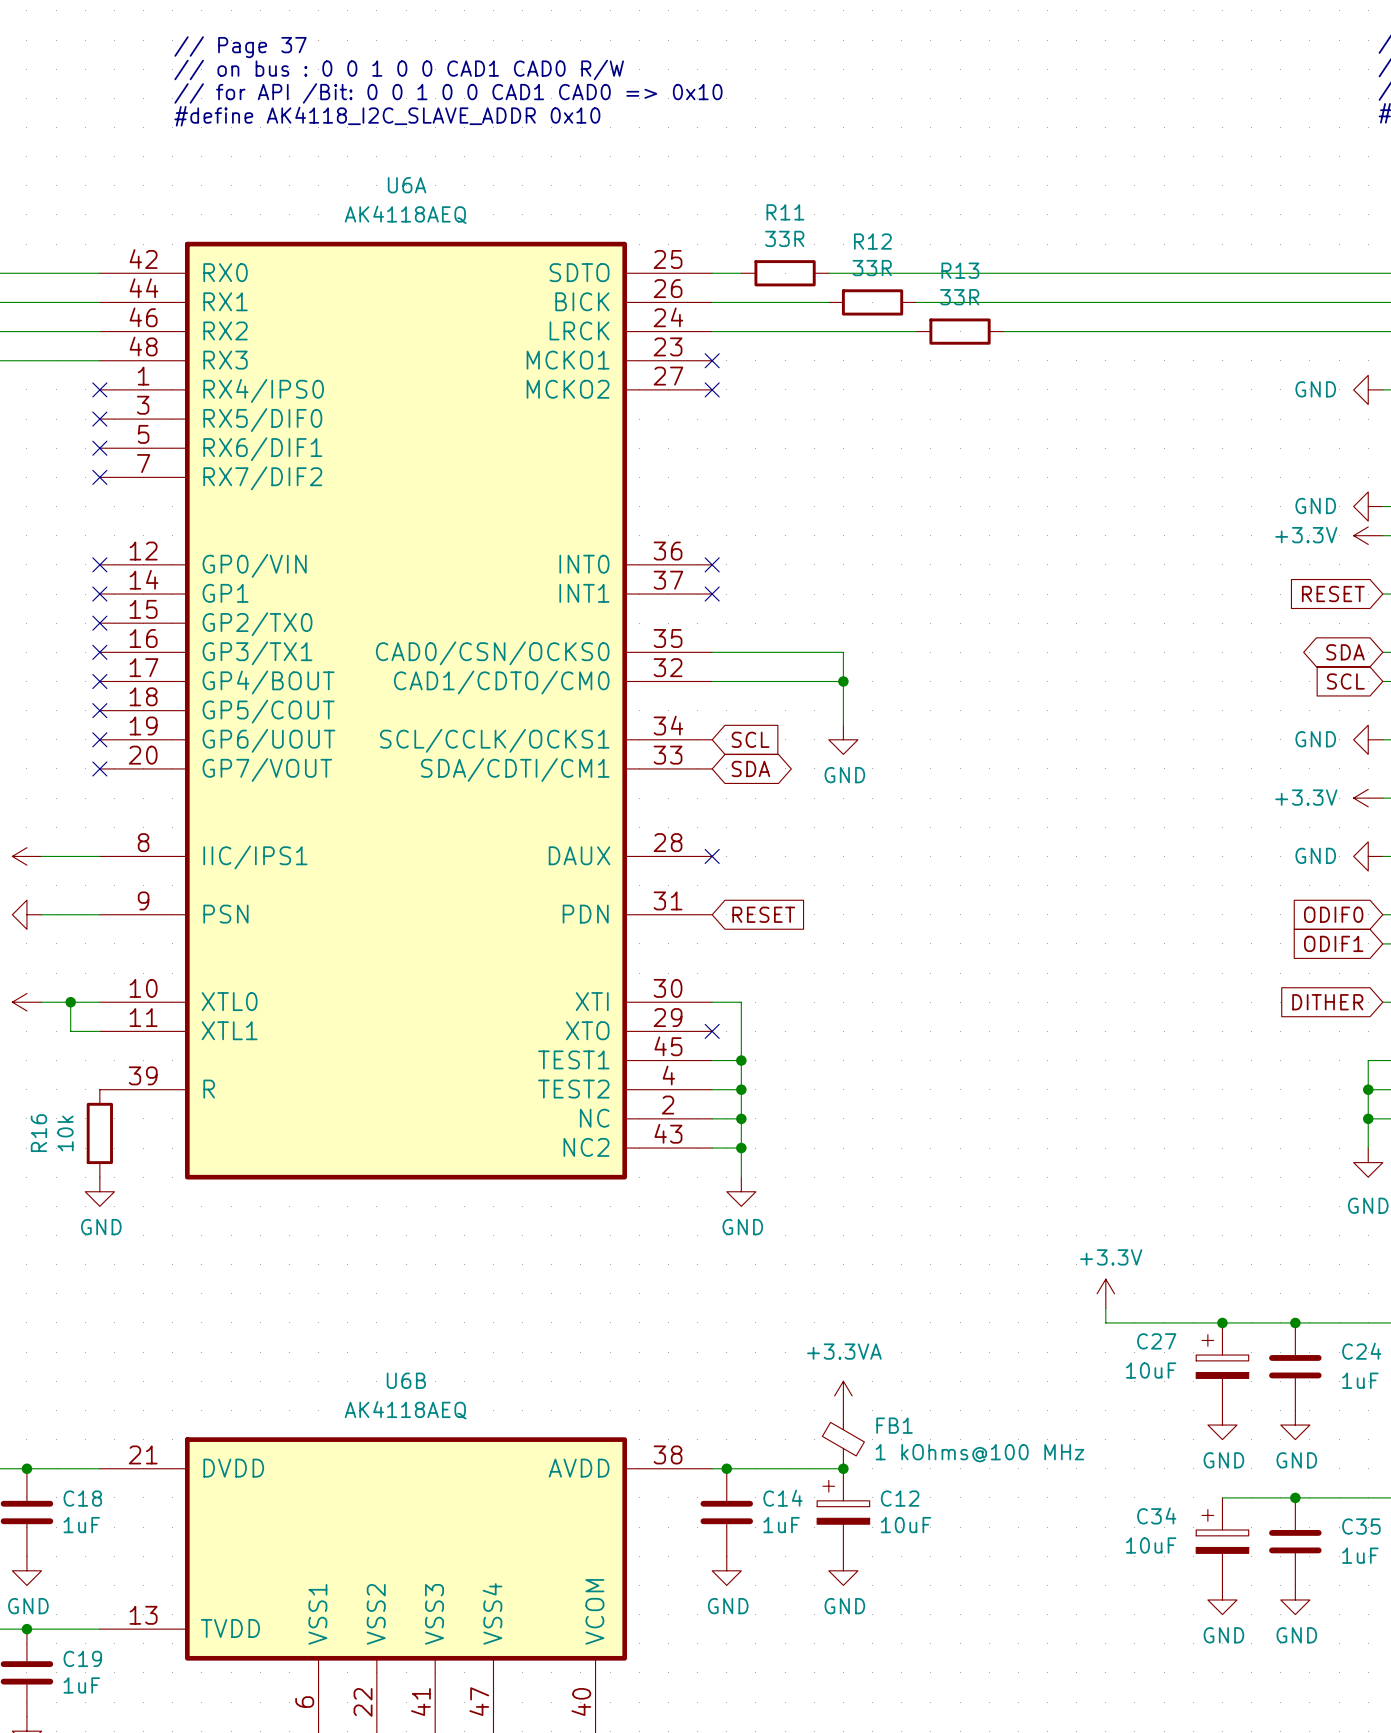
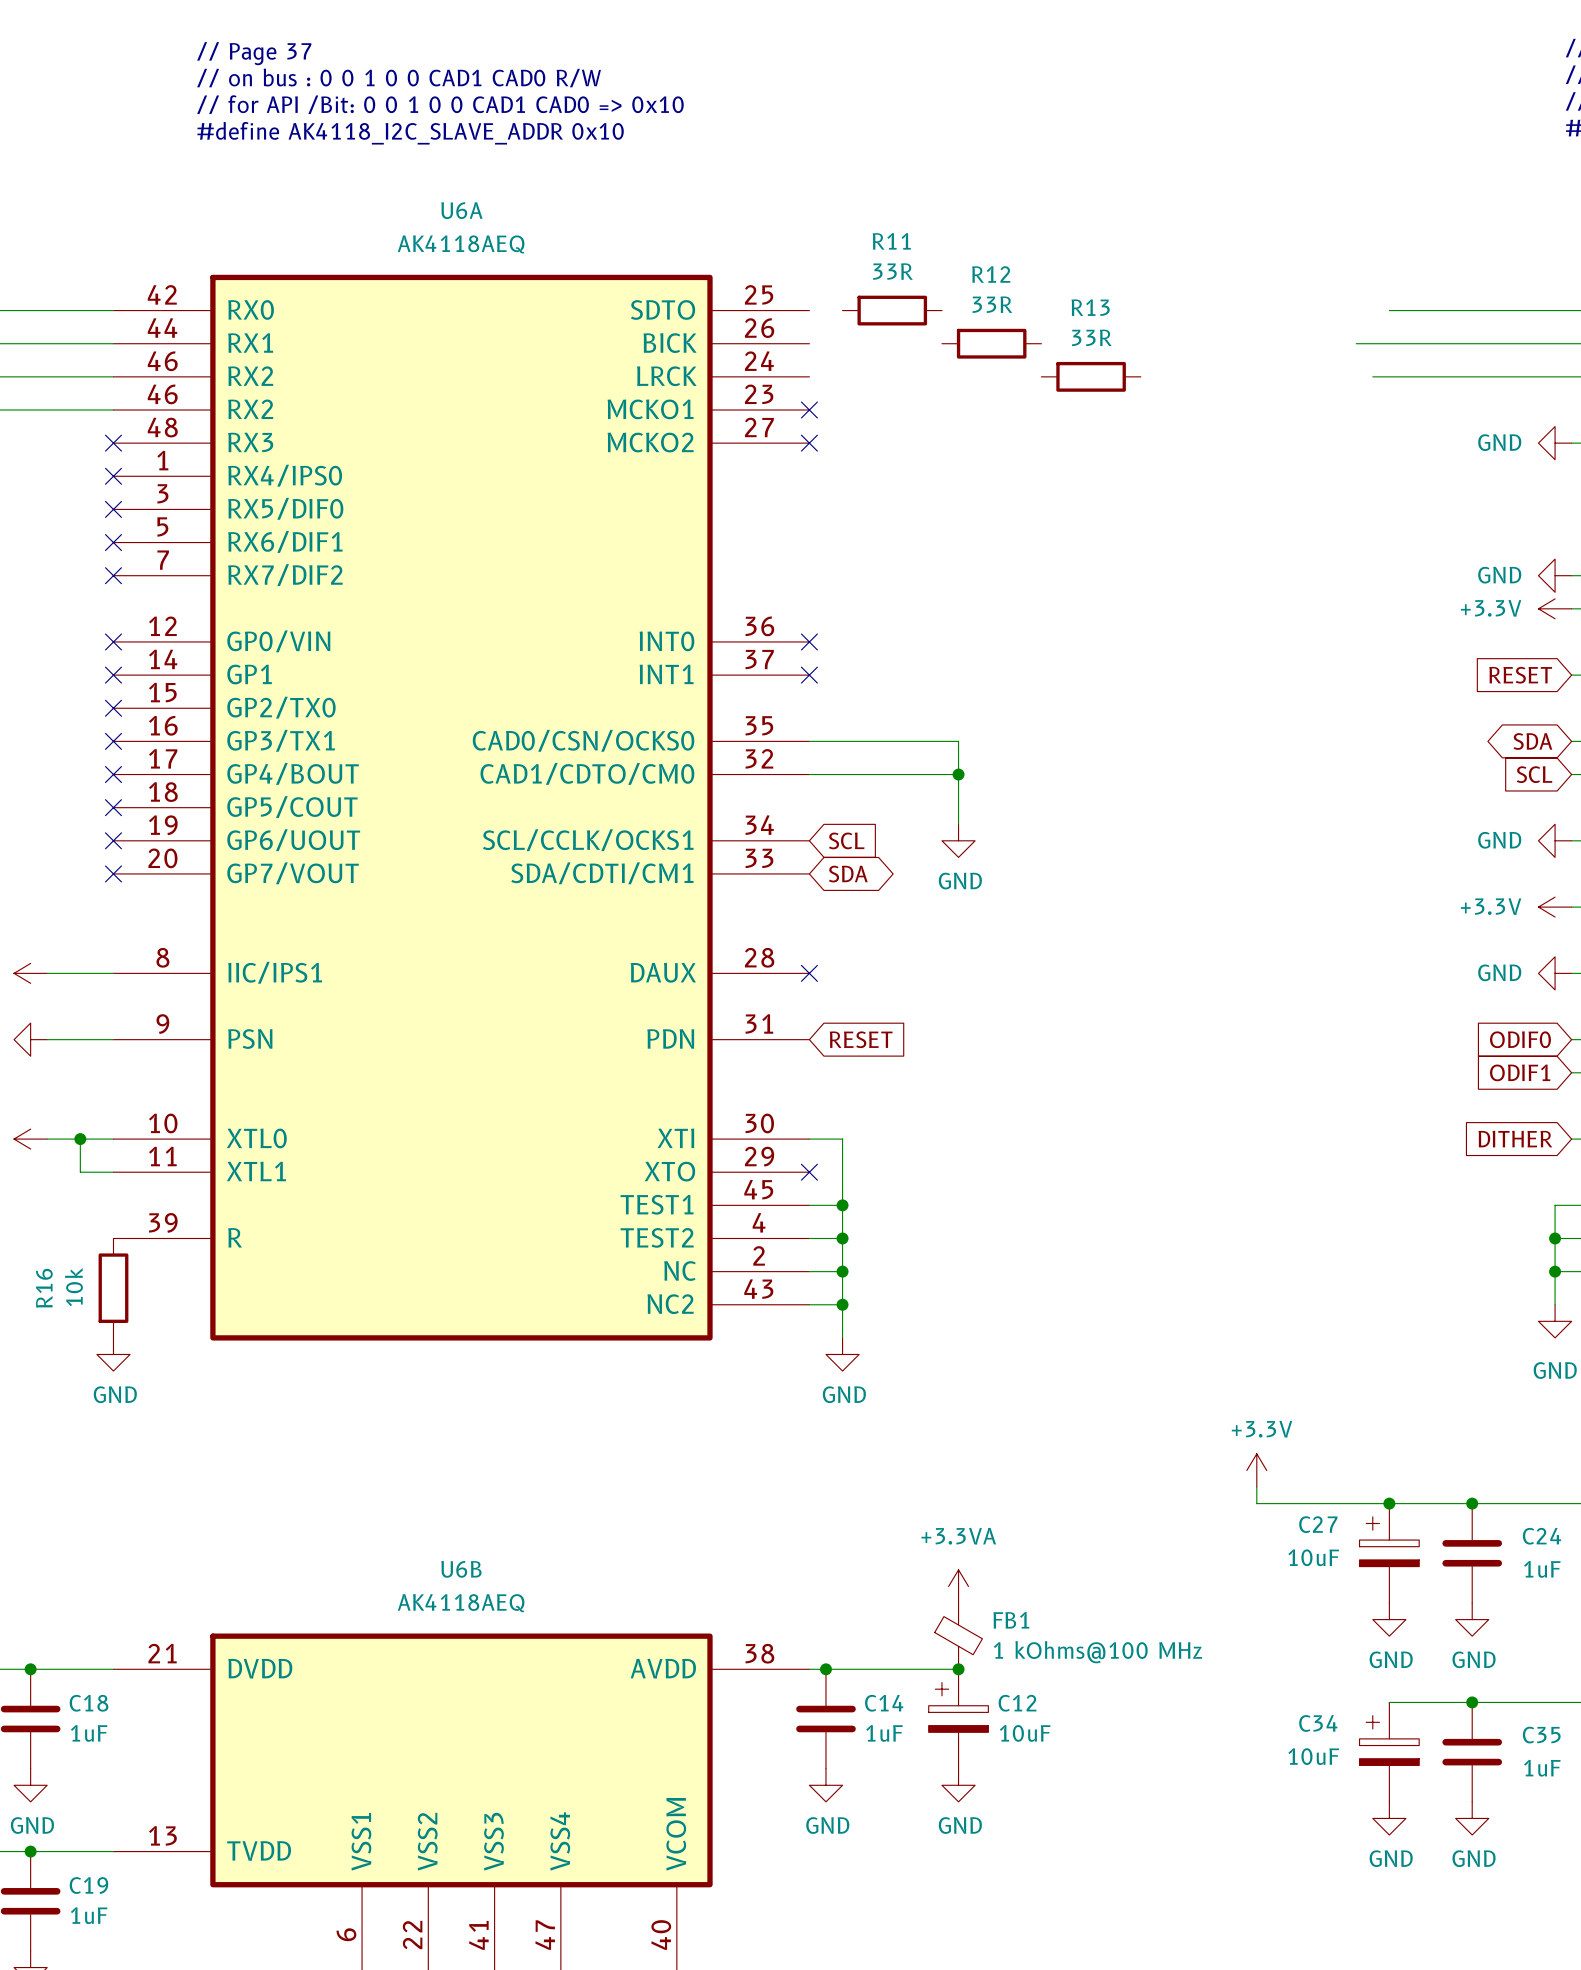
U6A symbol: [99, 241, 713, 1180] -> [113, 274, 810, 1341]
wire: (712, 273) (741, 273) -> none
wire: (828, 273) (1222, 273) -> none
wire: (712, 302) (828, 302) -> none
wire: (916, 302) (1193, 302) -> none
wire: (712, 331) (916, 331) -> none
wire: (1003, 331) (1207, 331) -> none
no-connect mark: none -> (113, 575)

